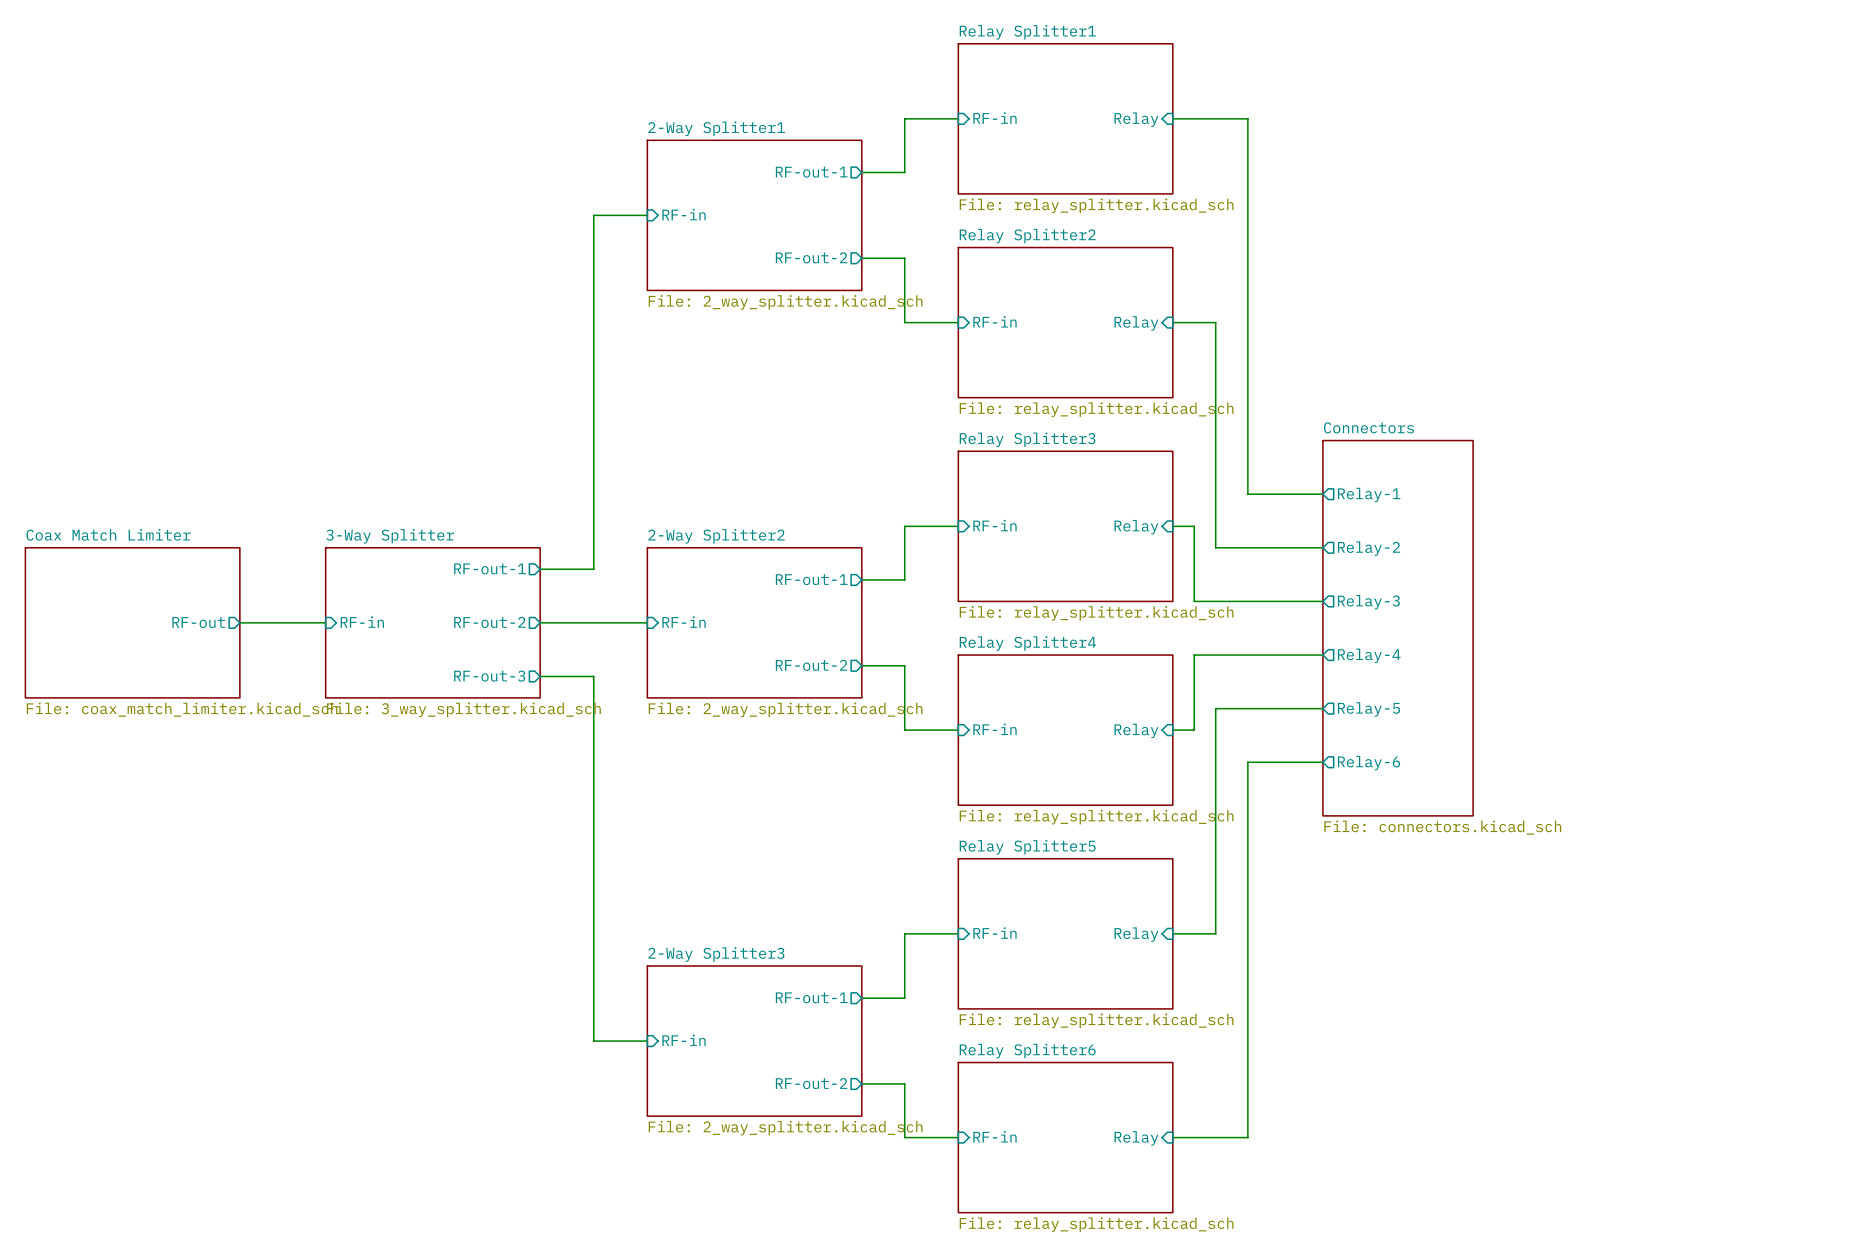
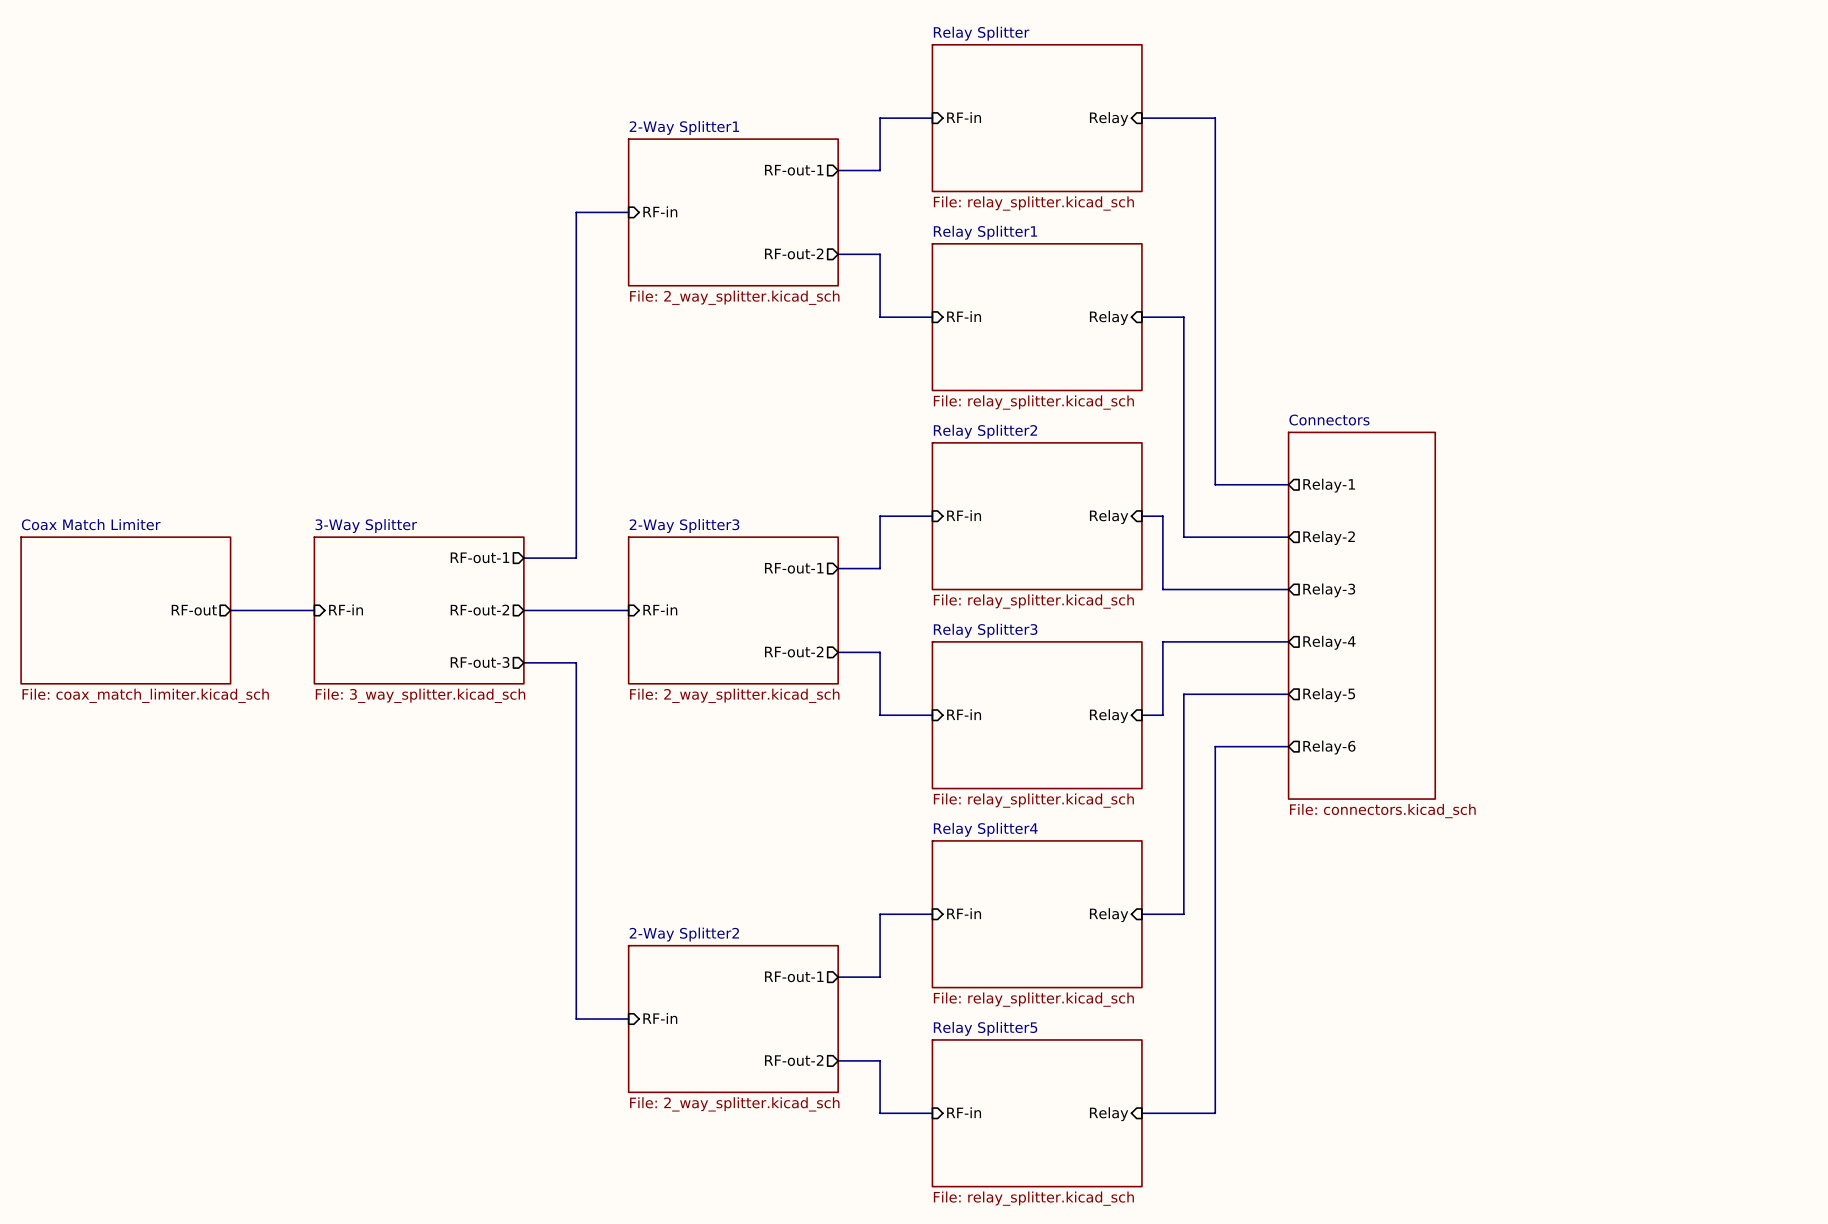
sheet Relay Splitter1 name: Relay Splitter1 (1027, 32) -> Relay Splitter (981, 33)
sheet Relay Splitter2 name: Relay Splitter2 (1027, 236) -> Relay Splitter1 (985, 232)
sheet Relay Splitter3 name: Relay Splitter3 (1027, 439) -> Relay Splitter2 (985, 431)
sheet 2-Way Splitter2 name: 2-Way Splitter2 (716, 536) -> 2-Way Splitter3 (684, 526)
sheet Relay Splitter4 name: Relay Splitter4 (1027, 643) -> Relay Splitter3 (985, 630)
sheet Relay Splitter5 name: Relay Splitter5 (1027, 847) -> Relay Splitter4 (985, 829)
sheet 2-Way Splitter3 name: 2-Way Splitter3 (716, 954) -> 2-Way Splitter2 (684, 934)
sheet Relay Splitter6 name: Relay Splitter6 (1027, 1050) -> Relay Splitter5 (985, 1028)

